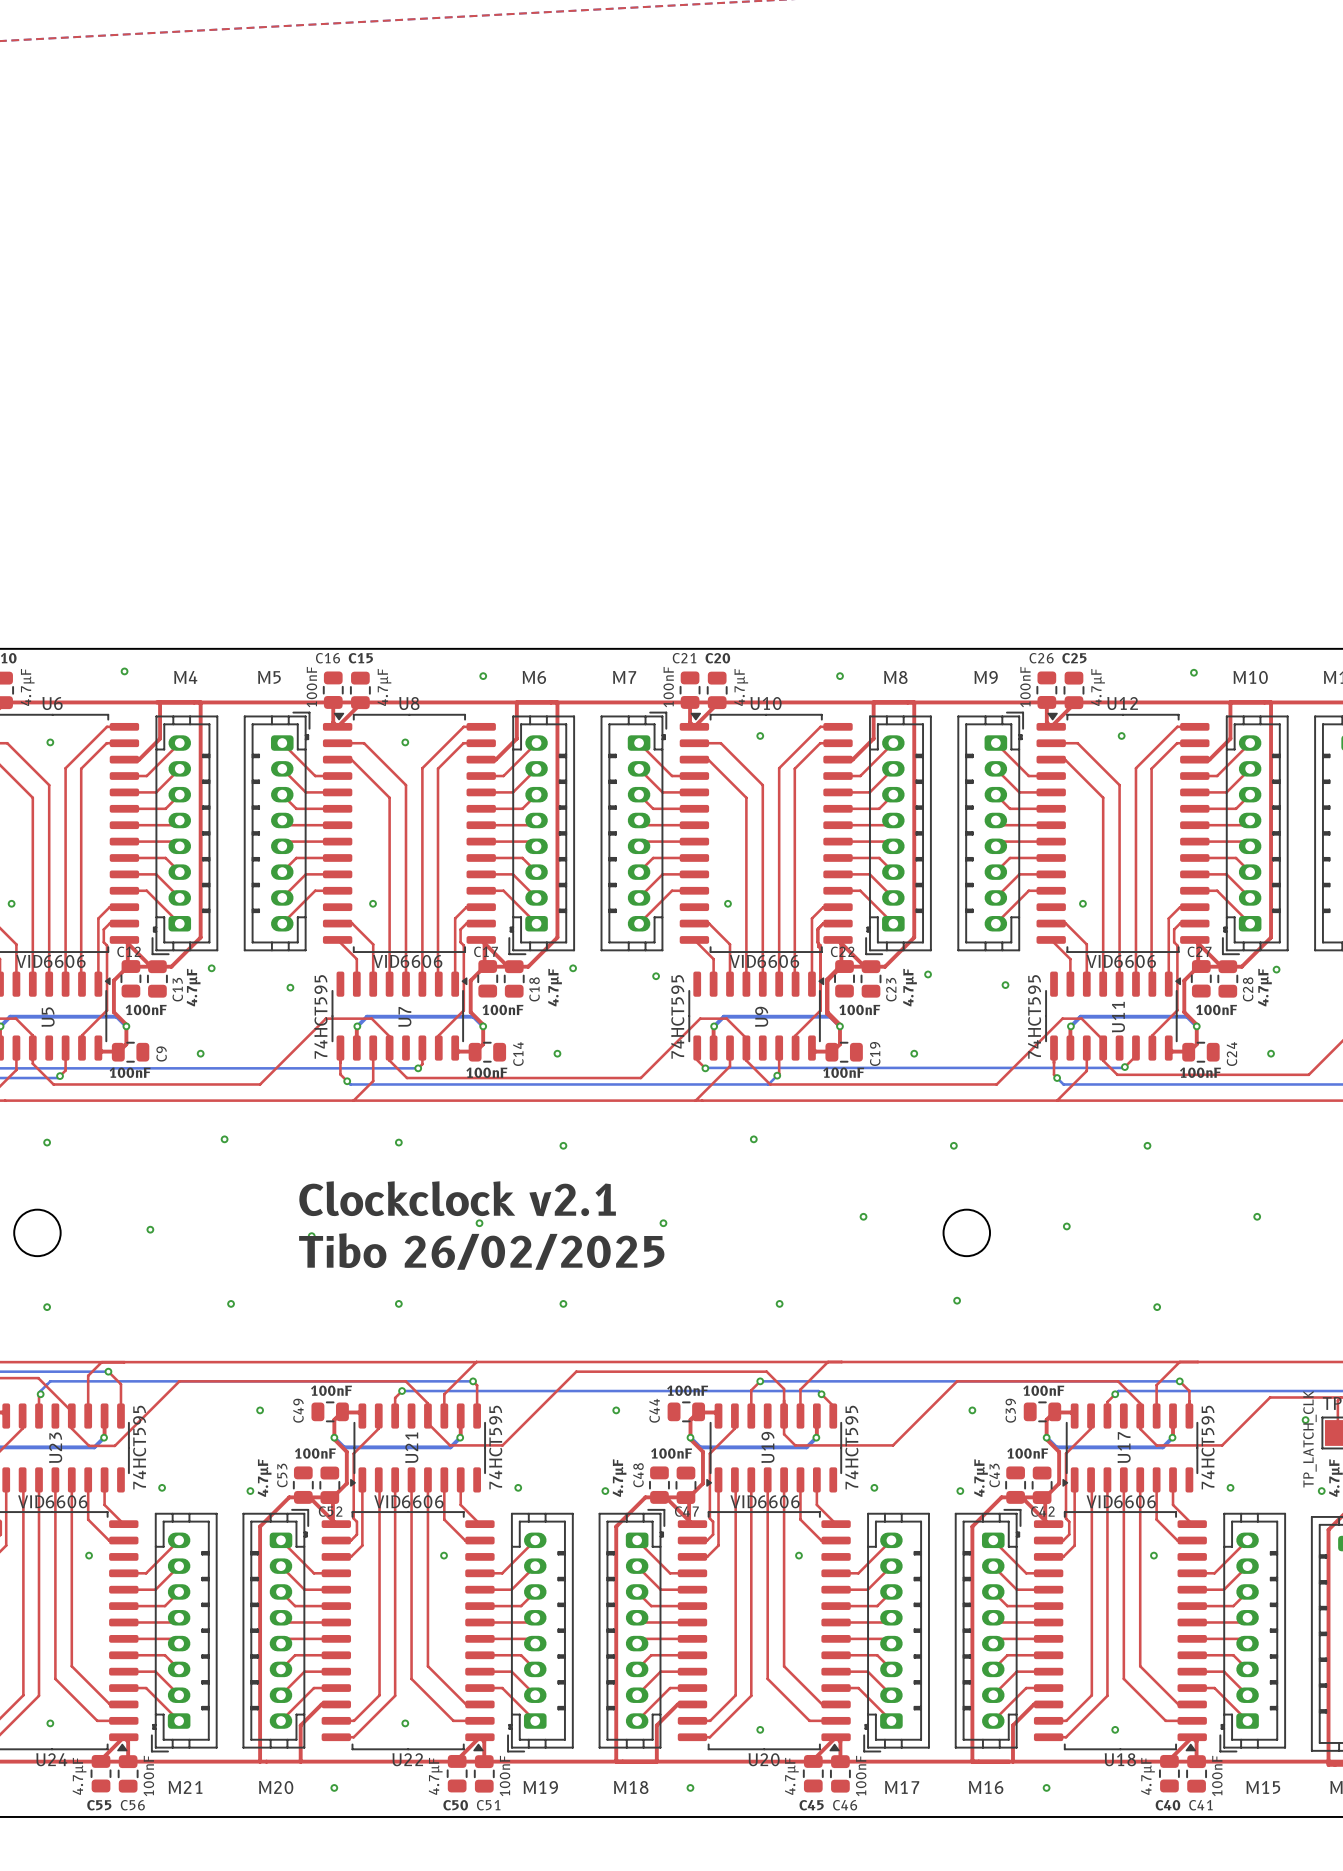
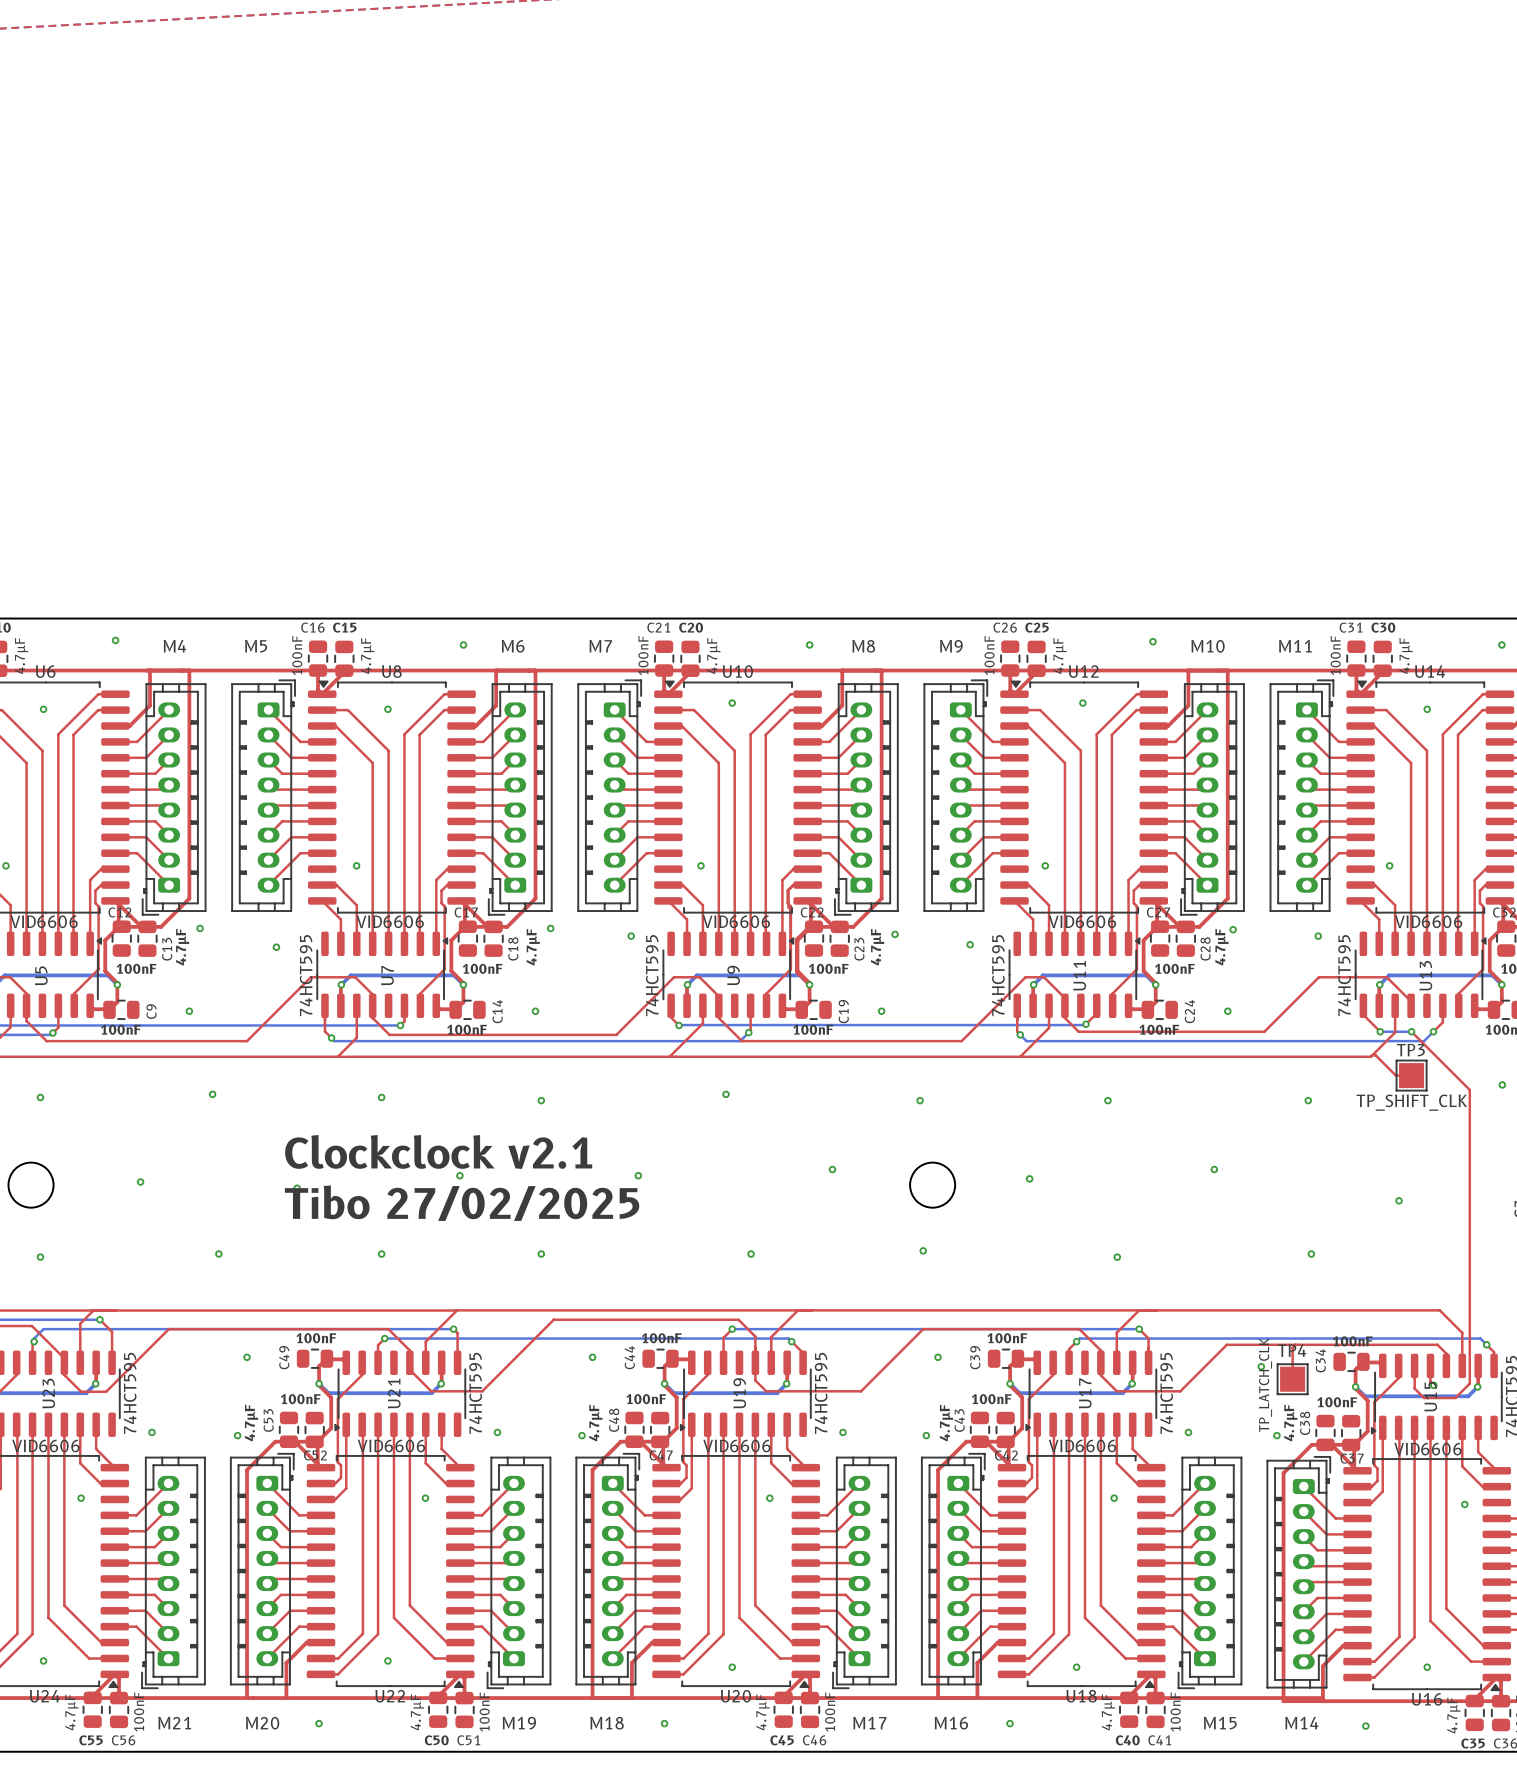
text: Tibo 26/02/2025 (481, 1251) -> Tibo 27/02/2025 (462, 1203)

